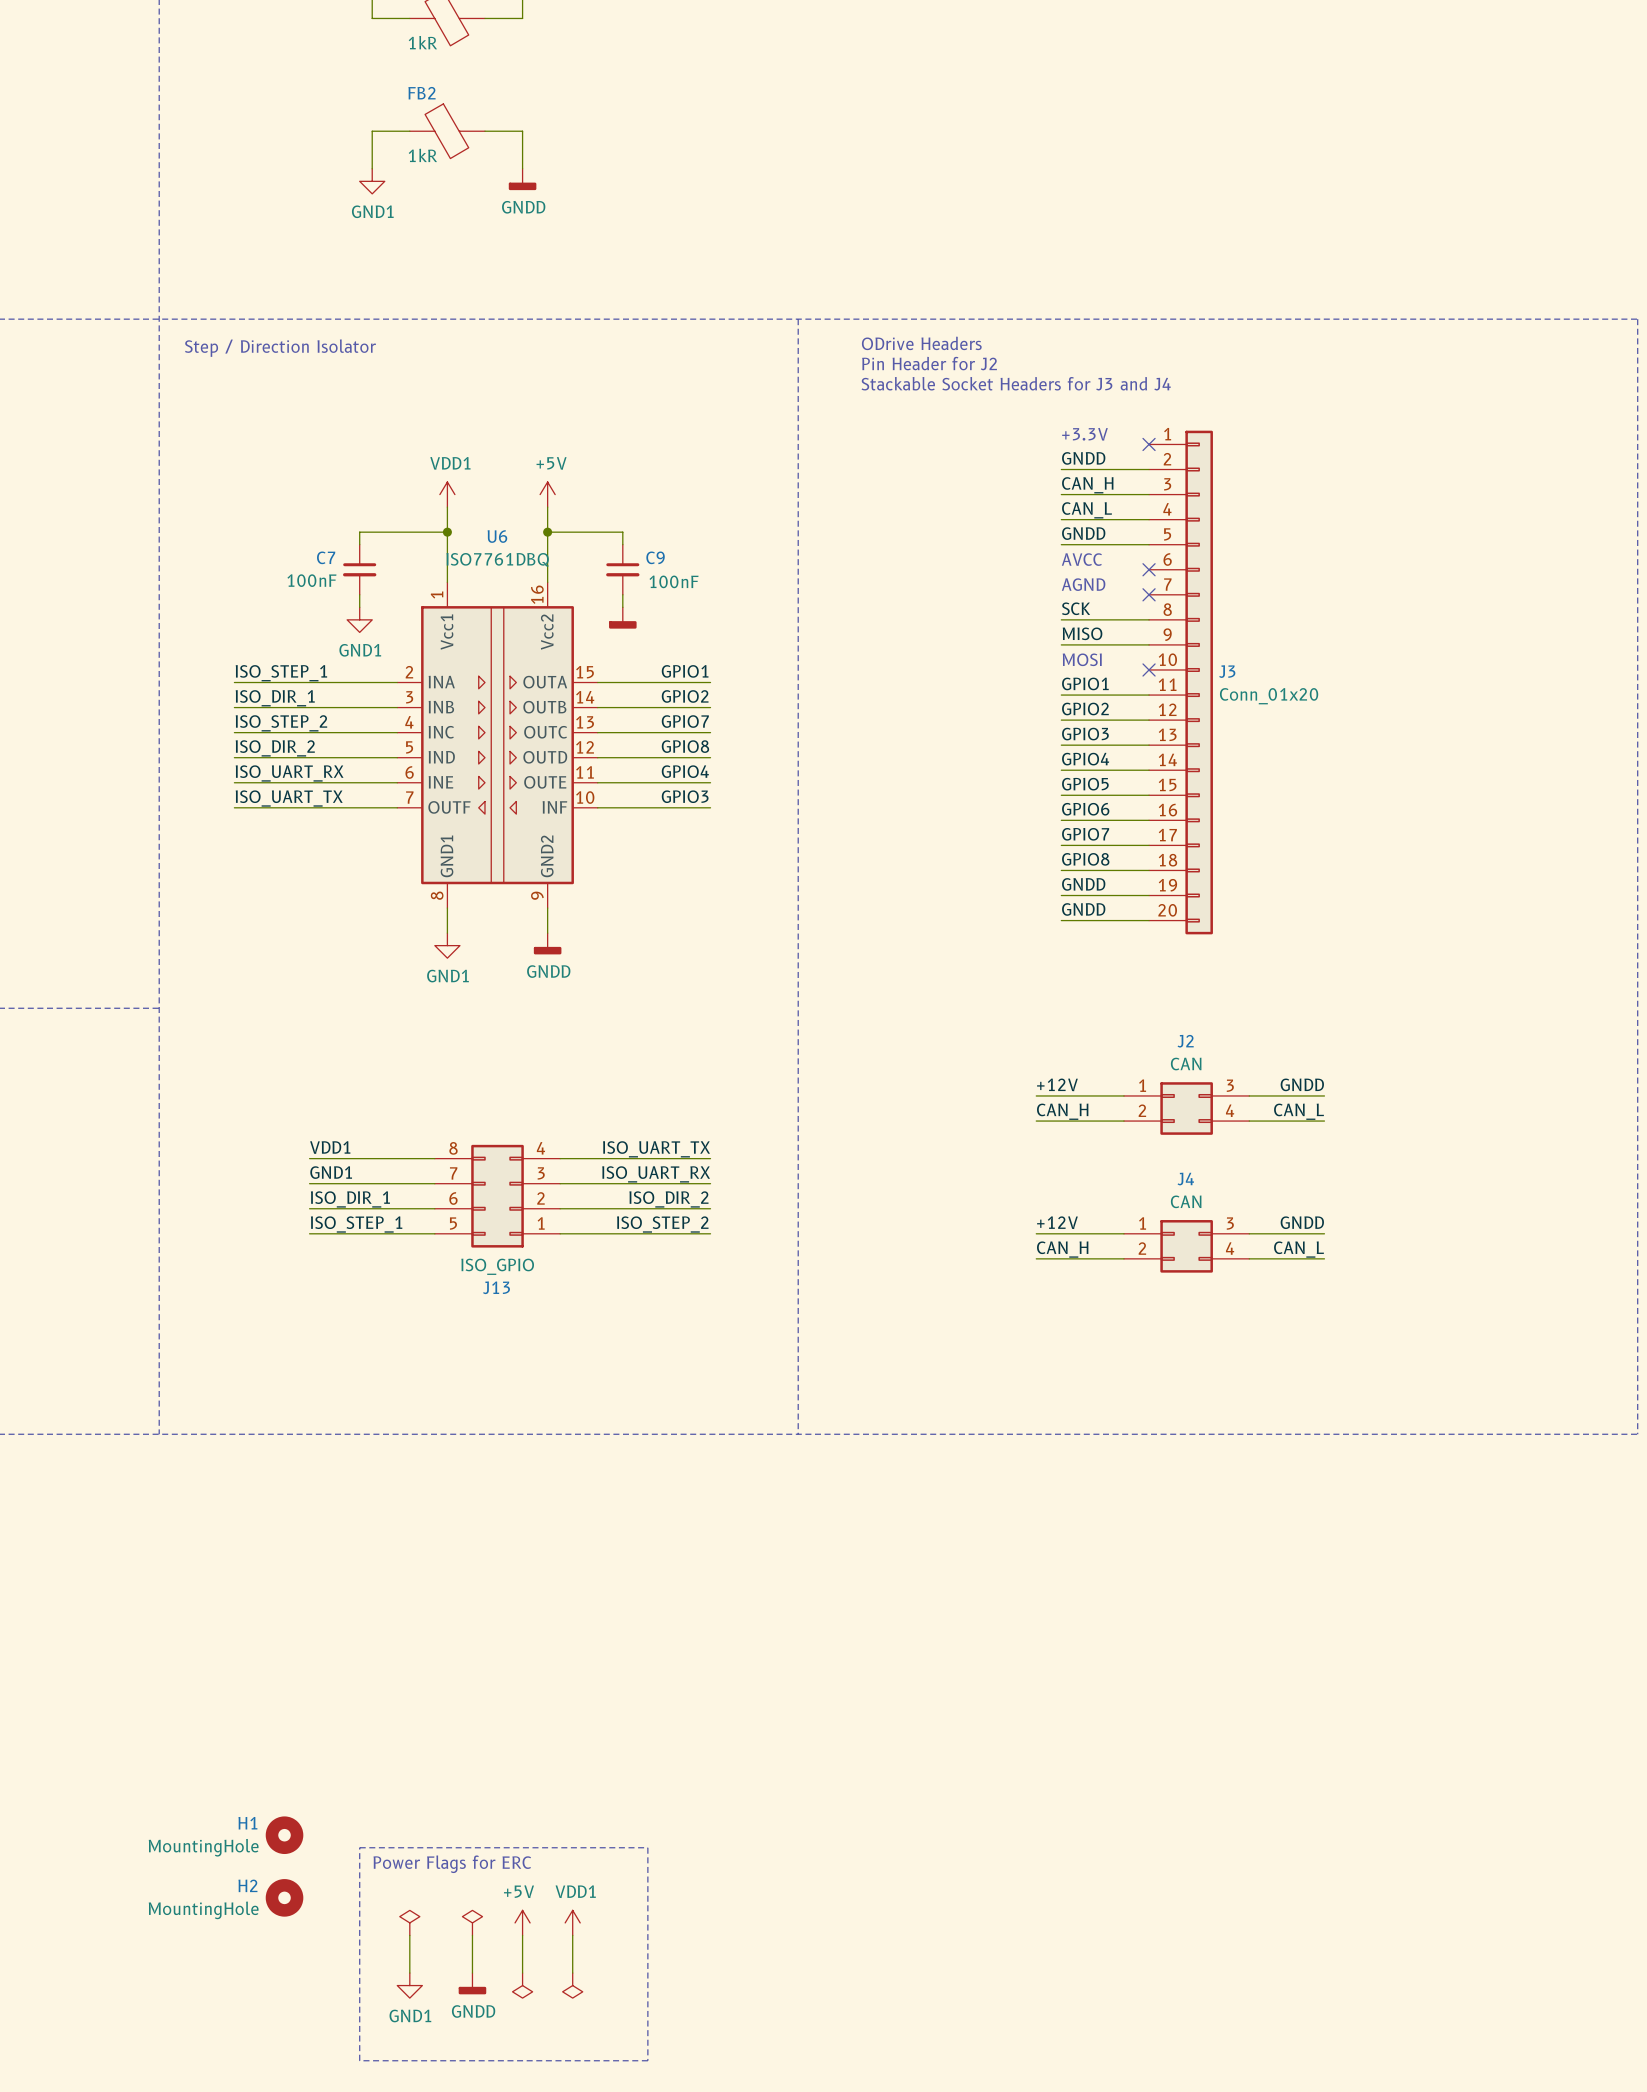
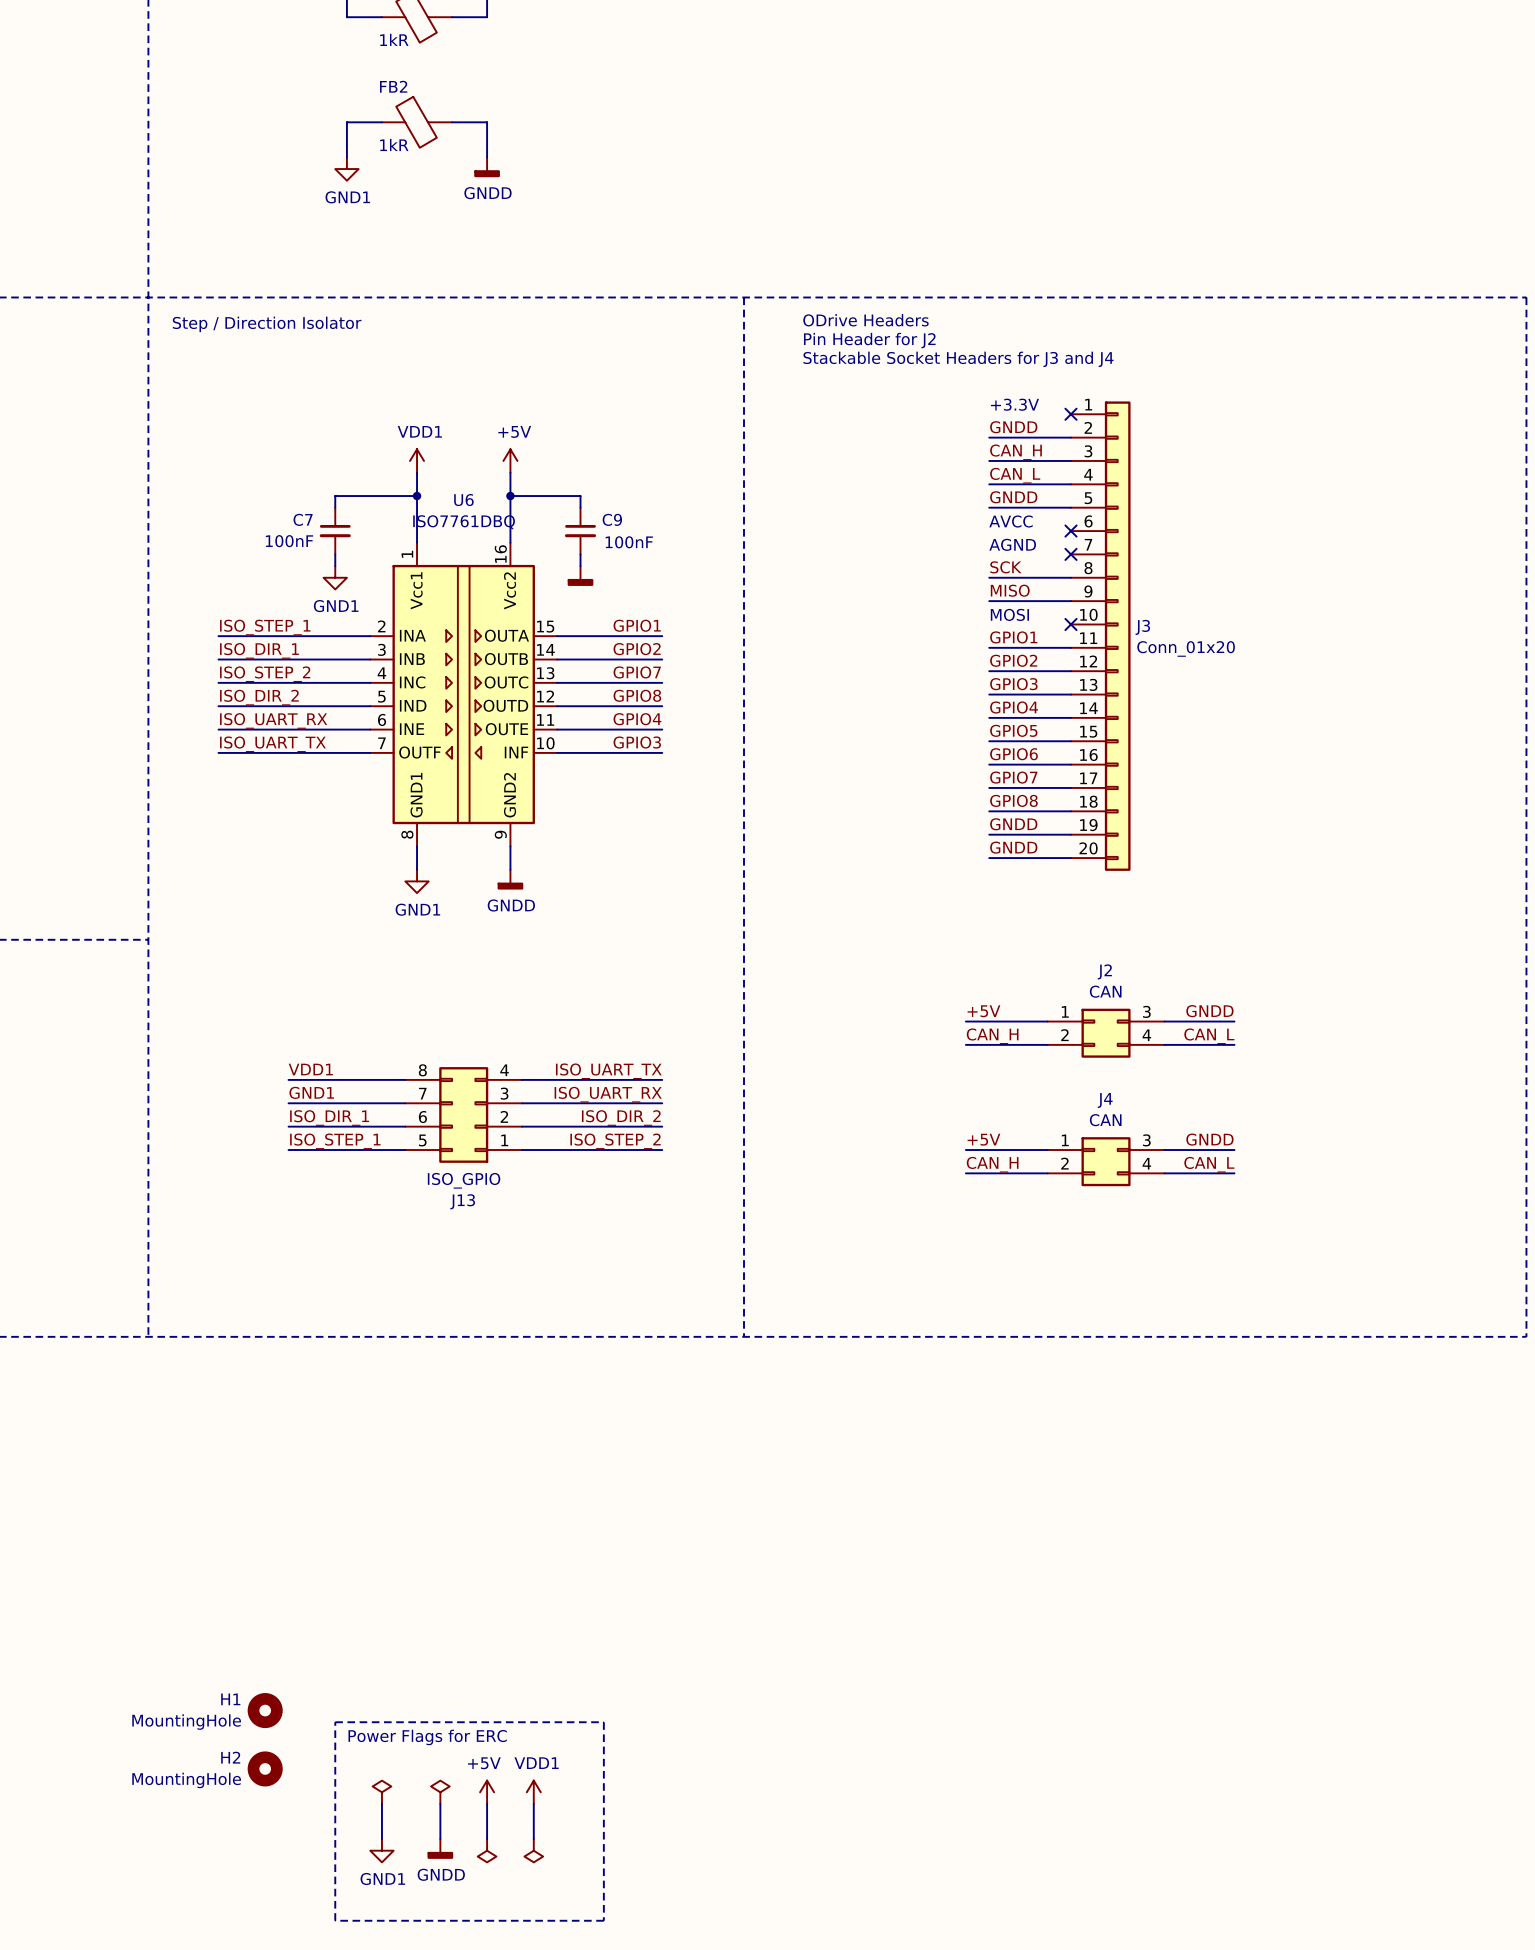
label: +12V (1057, 1084) -> +5V (983, 1011)
label: +12V (1057, 1222) -> +5V (983, 1139)

